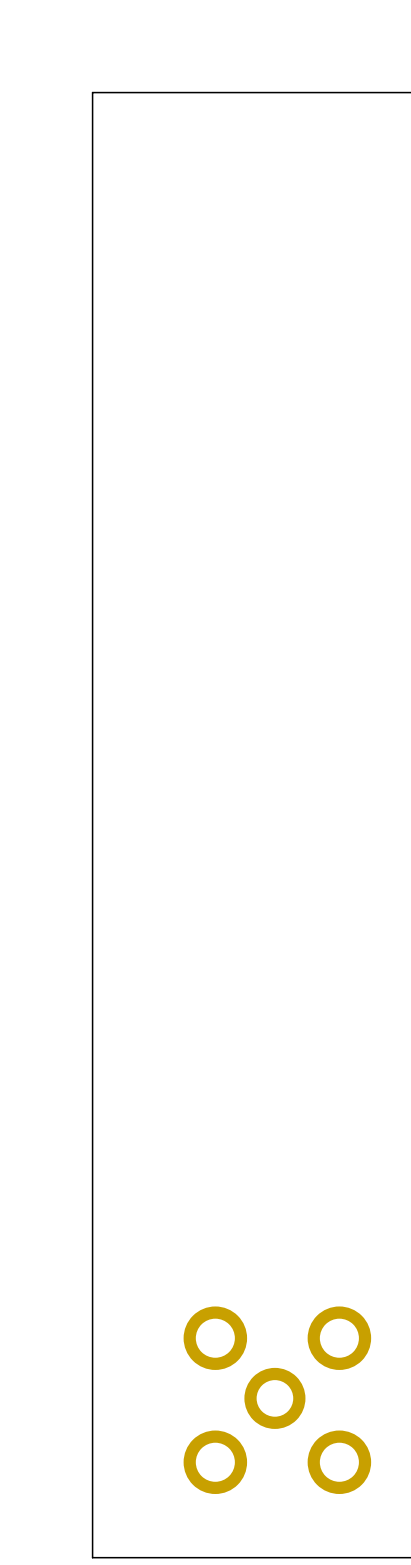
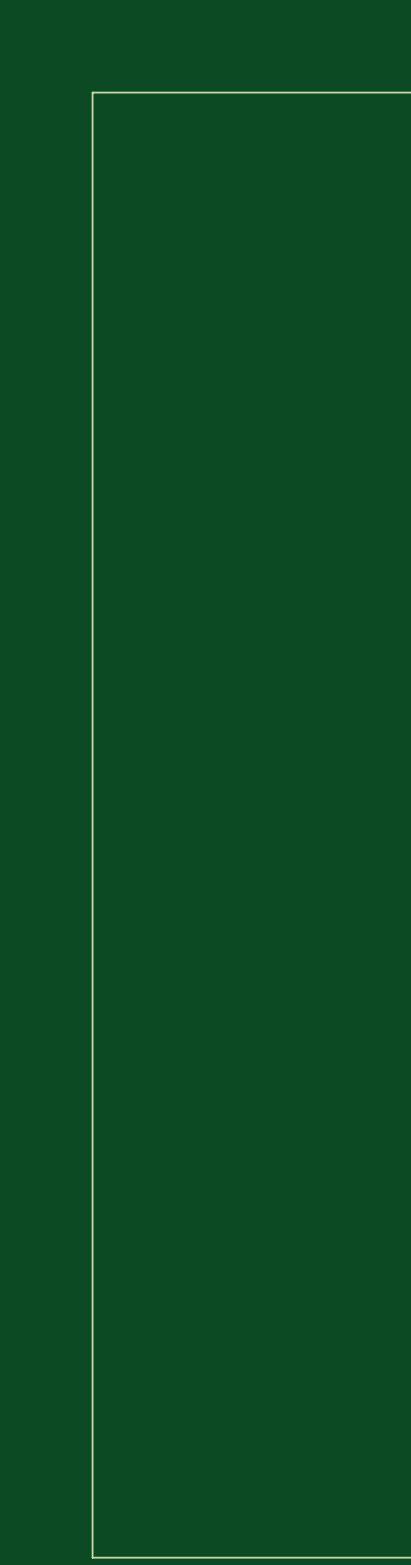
part: (277, 1400) -> none

